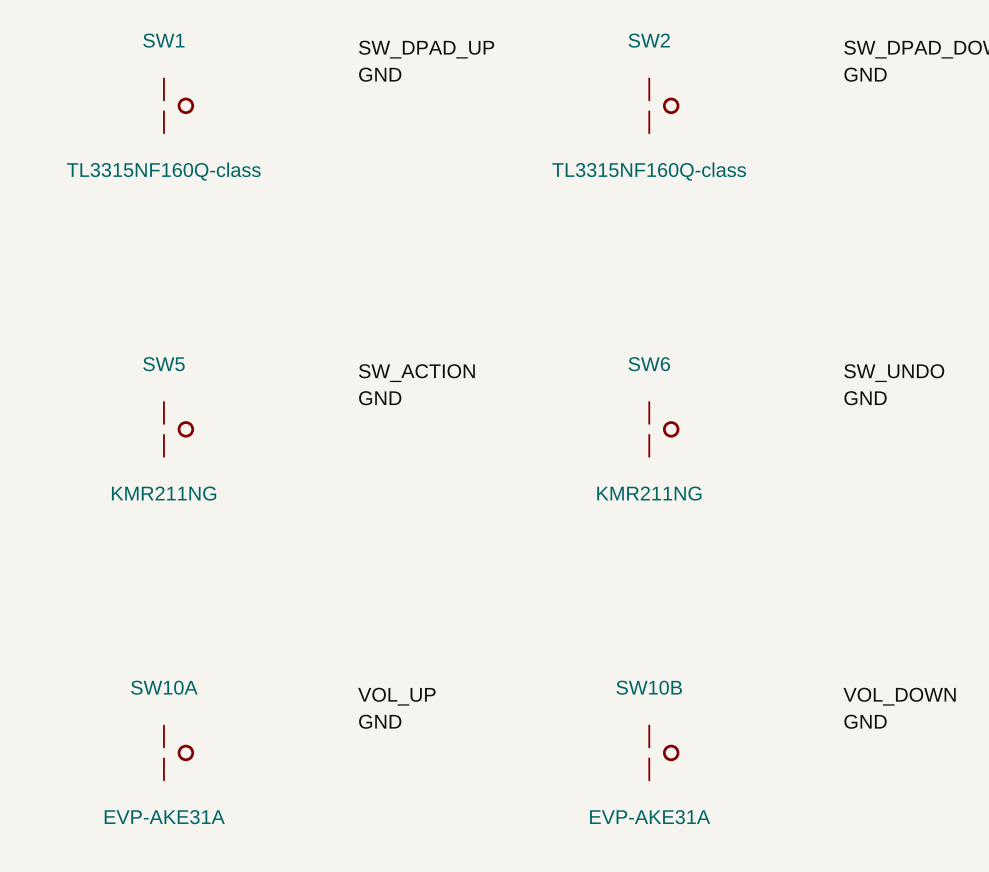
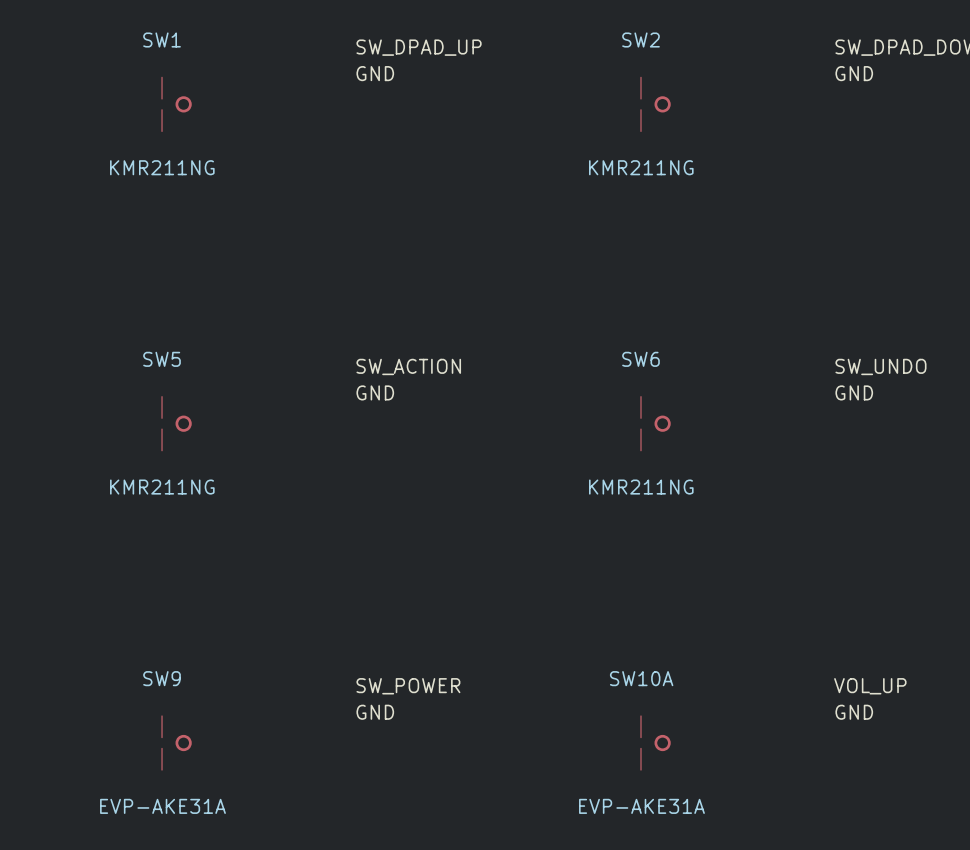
SW1 value: TL3315NF160Q-class (163, 171) -> KMR211NG (162, 167)
SW2 value: TL3315NF160Q-class (649, 171) -> KMR211NG (641, 167)
SW10A name: SW10A (164, 687) -> SW9 (162, 678)
SW10B name: SW10B (649, 687) -> SW10A (641, 678)
label: VOL_UP (396, 696) -> SW_POWER (408, 686)
label: VOL_DOWN (899, 696) -> VOL_UP (870, 686)

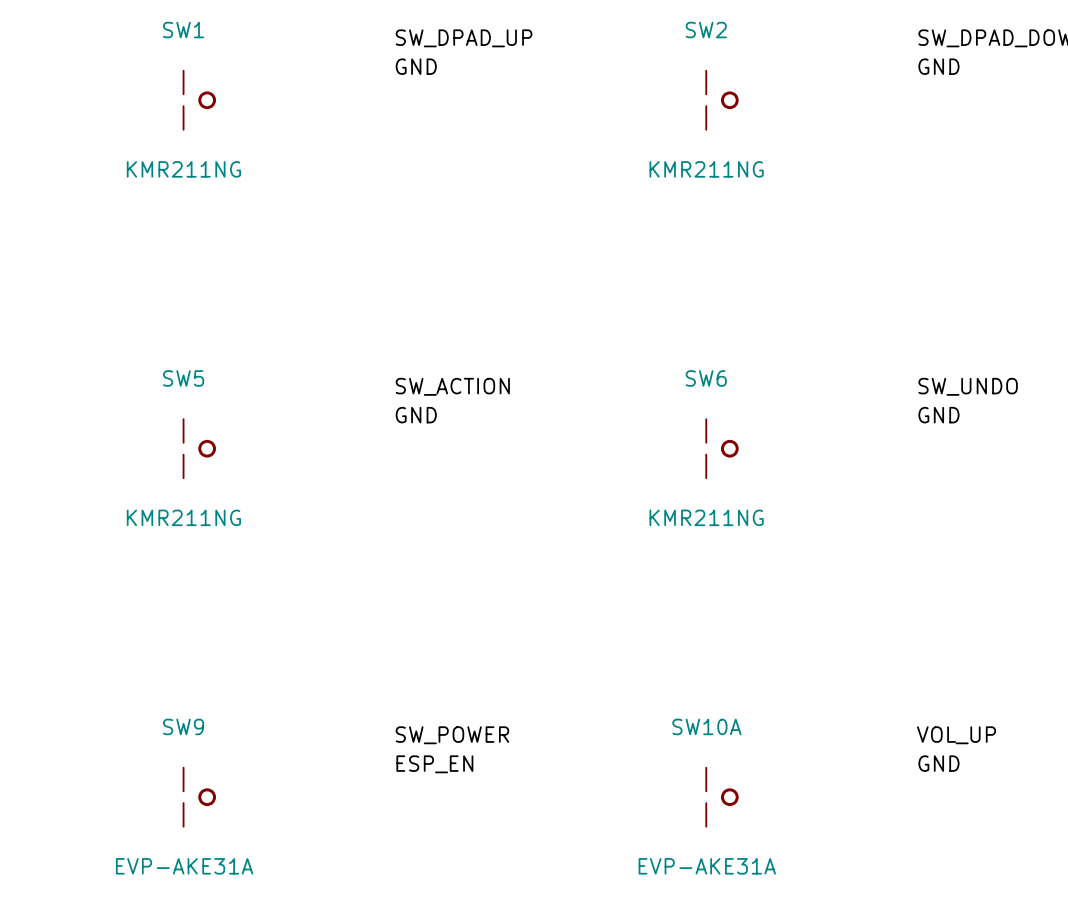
label: GND (375, 712) -> ESP_EN (434, 764)

